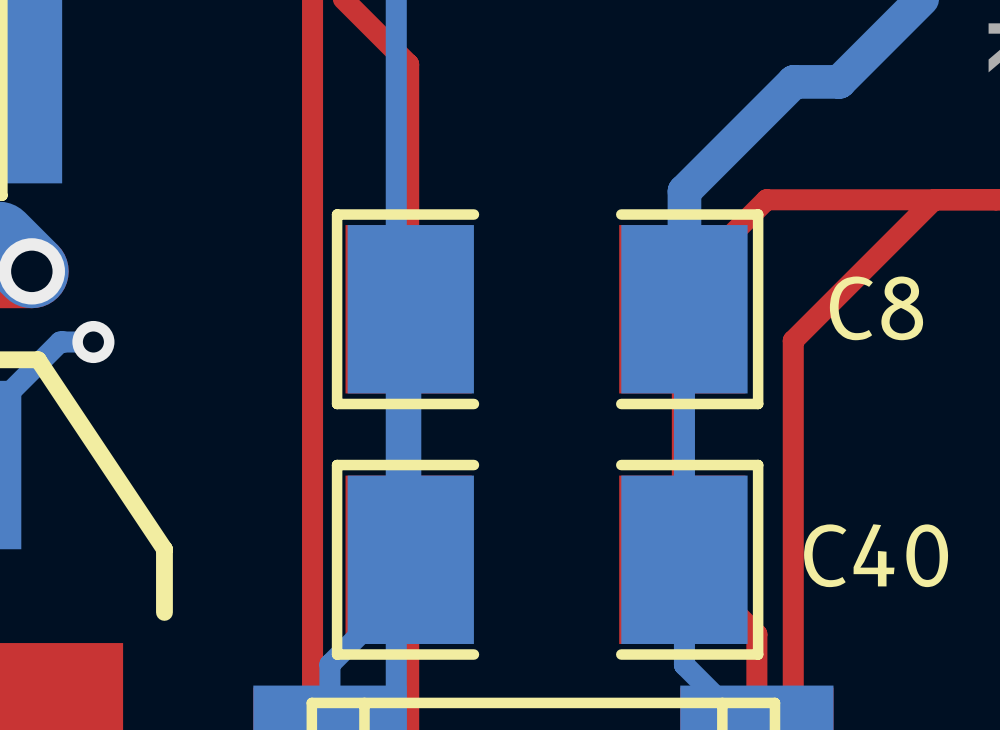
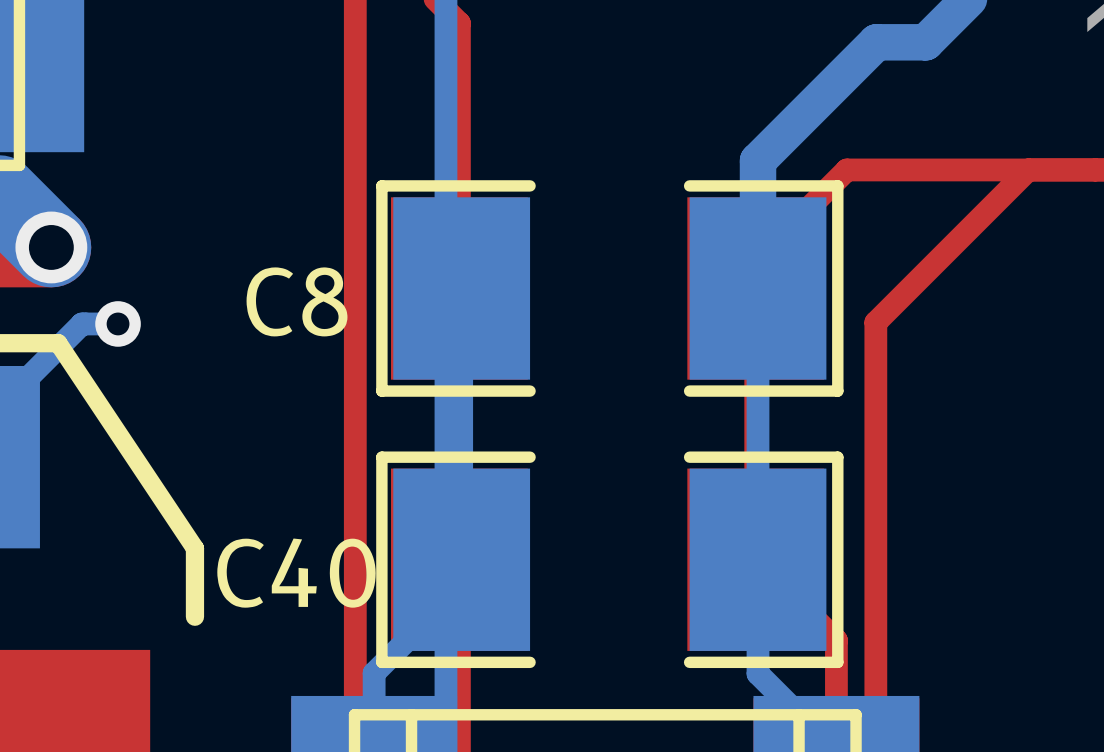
C8 name position: C8 (876, 308) -> C8 (297, 301)
C40 name position: C40 (876, 555) -> C40 (296, 573)

